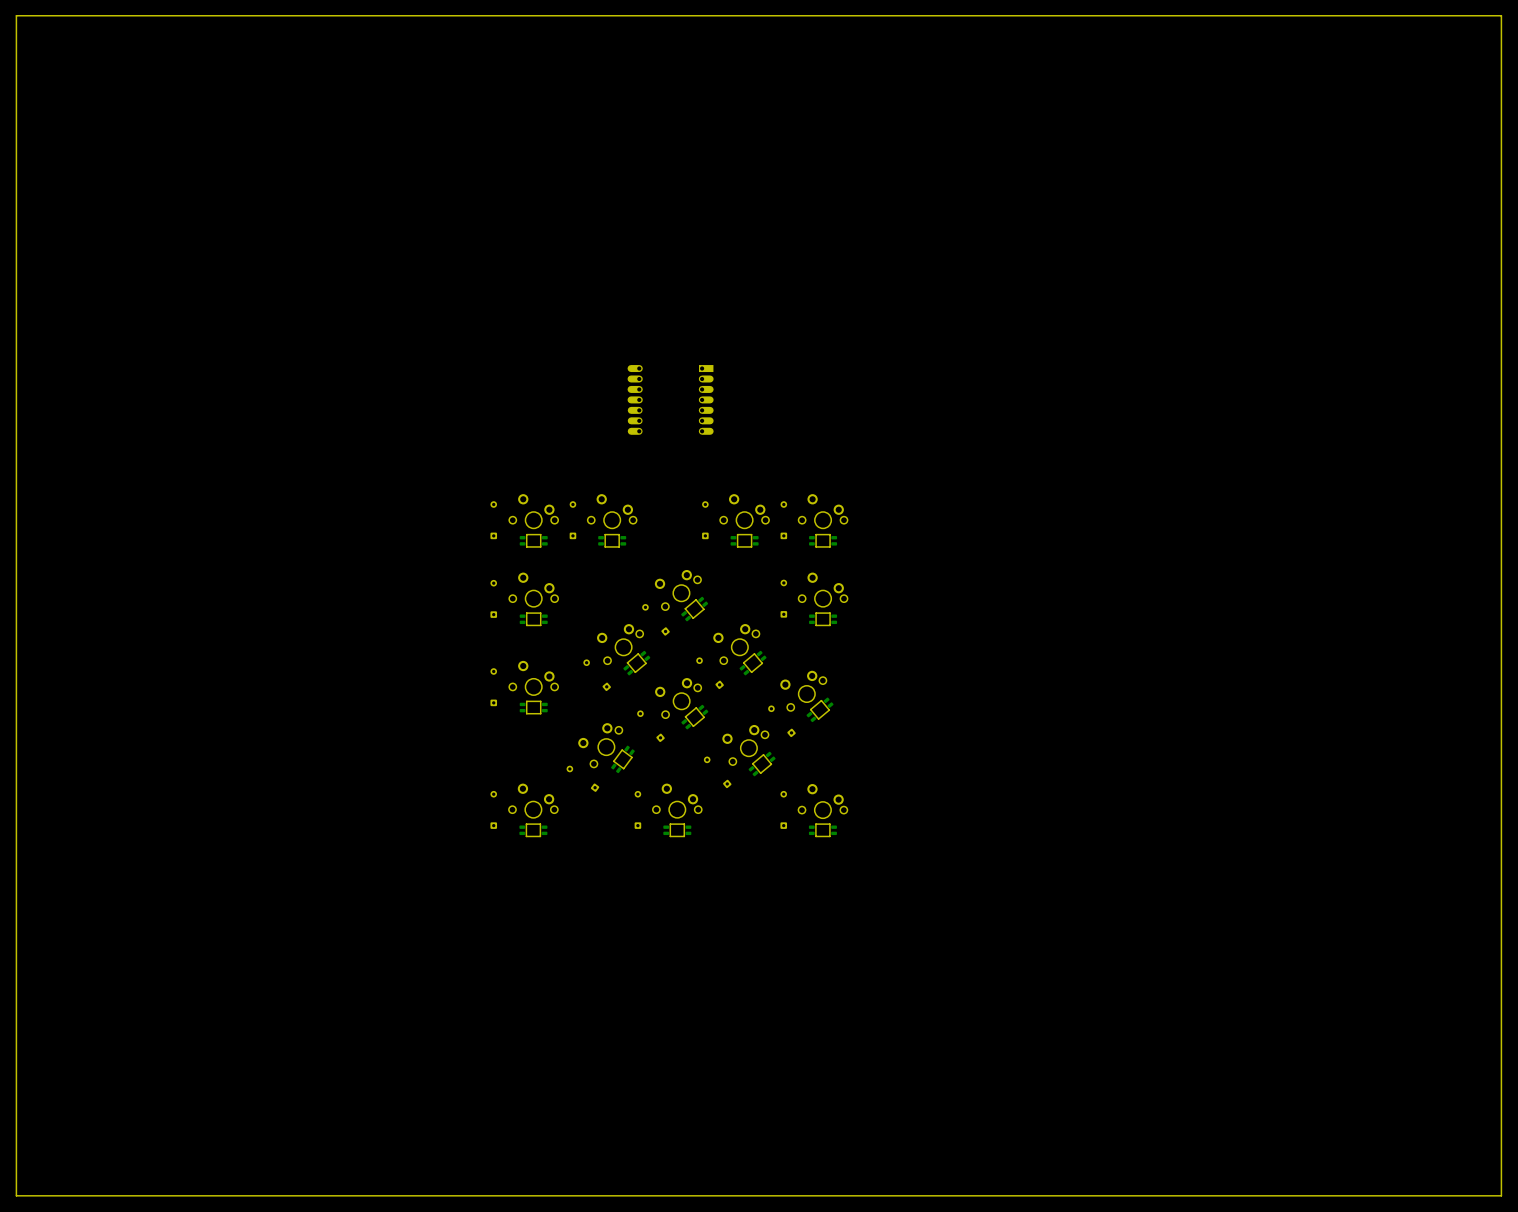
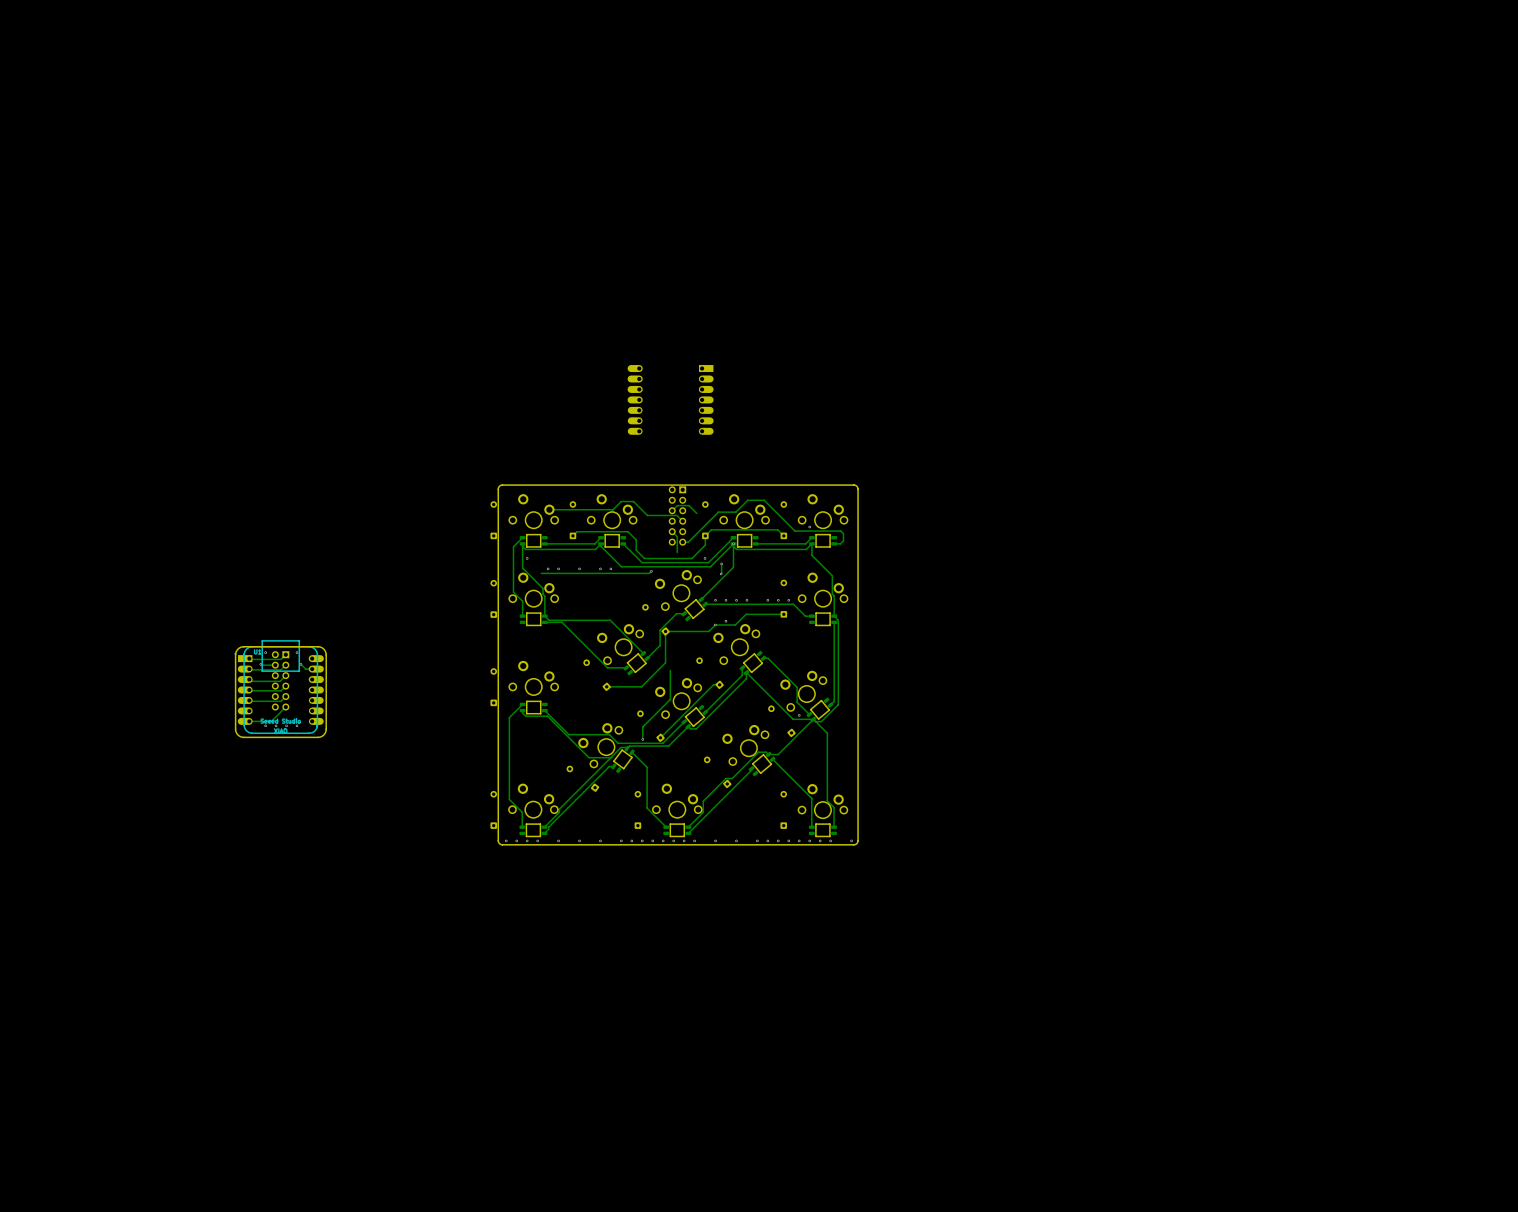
board edge: (1501, 15) (16, 15) (16, 1195) (1501, 1195) (1501, 15) -> none
board edge: none -> (853, 485) (499, 486) (499, 843) (856, 843) (858, 489) (853, 485)
track: none -> (549, 509) (612, 509) (621, 501) (633, 501) (647, 515) (677, 515) (682, 521)
track: none -> (672, 510) (677, 505) (688, 505) (696, 513)
part: none -> (677, 515)
via: none -> (809, 527)
track: none -> (672, 531) (677, 536) (677, 552)
track: none -> (783, 535) (777, 529) (711, 529) (705, 535) (705, 545) (691, 558) (644, 558) (636, 550) (636, 539) (628, 531) (577, 531) (572, 535)
track: none -> (522, 537) (513, 546) (513, 592) (522, 601) (522, 616)
track: none -> (601, 537) (594, 543) (544, 543)
track: none -> (733, 537) (708, 562) (642, 562) (623, 543)
track: none -> (811, 537) (805, 543) (755, 543)
track: none -> (682, 542) (688, 542) (718, 512) (735, 512) (747, 500) (764, 500) (794, 531) (840, 531) (843, 533) (843, 540) (840, 543) (834, 543)
track: none -> (522, 543) (522, 568) (543, 588) (544, 616) (548, 620) (610, 620) (643, 653)
via: none -> (733, 543)
track: none -> (522, 546) (525, 549) (595, 549) (601, 543) (601, 546) (621, 566) (710, 566) (733, 543) (733, 567) (701, 599)
track: none -> (733, 546) (736, 549) (806, 549) (811, 543) (811, 555) (832, 575) (834, 616) (838, 620) (838, 704) (821, 721) (815, 721)
via: none -> (527, 558)
via: none -> (705, 558)
track: none -> (721, 563) (721, 574)
via: none -> (721, 563)
via: none -> (548, 568)
via: none -> (558, 568)
via: none -> (579, 568)
via: none -> (600, 568)
via: none -> (610, 568)
track: none -> (651, 571) (649, 573) (541, 573)
via: none -> (651, 571)
via: none -> (721, 574)
via: none -> (715, 600)
via: none -> (725, 600)
via: none -> (736, 600)
via: none -> (746, 600)
via: none -> (767, 600)
via: none -> (778, 600)
via: none -> (788, 600)
track: none -> (705, 604) (793, 604) (805, 616) (811, 616)
track: none -> (684, 613) (676, 613) (660, 630) (660, 645) (647, 658)
track: none -> (783, 614) (746, 614) (735, 624) (715, 624) (708, 631) (665, 631) (665, 662) (641, 686) (606, 686)
via: none -> (725, 621)
track: none -> (544, 622) (562, 622) (607, 667) (626, 667)
track: none -> (834, 622) (834, 701) (830, 705)
via: none -> (715, 624)
board edge: none -> (317, 646) (243, 646) (238, 649) (235, 654) (235, 729) (238, 734) (243, 737) (317, 737) (323, 734) (326, 729) (326, 654) (323, 648) (317, 646)
via: none -> (265, 652)
via: none -> (297, 652)
track: none -> (285, 654) (281, 659) (249, 658)
track: none -> (763, 658) (768, 658) (797, 687) (797, 702) (809, 714)
track: none -> (260, 664) (275, 665)
via: none -> (260, 664)
track: none -> (300, 664) (305, 669) (312, 669)
via: none -> (300, 664)
track: none -> (285, 665) (281, 669) (249, 669)
track: none -> (742, 667) (742, 675) (705, 712)
track: none -> (670, 670) (670, 699) (642, 727) (642, 739)
track: none -> (285, 675) (280, 681) (251, 681) (249, 679)
part: none -> (280, 680)
track: none -> (719, 684) (713, 684) (660, 737)
track: none -> (285, 686) (281, 690) (249, 690)
part: none -> (279, 687)
track: none -> (285, 696) (281, 701) (249, 700)
track: none -> (522, 704) (509, 717) (509, 799) (522, 812) (522, 827)
track: none -> (285, 707) (271, 721) (249, 721)
track: none -> (522, 710) (525, 716) (547, 716) (588, 757) (610, 757)
track: none -> (544, 710) (568, 734) (609, 734) (618, 743) (662, 743) (684, 721)
via: none -> (799, 715)
track: none -> (813, 719) (827, 733) (827, 800) (834, 807) (834, 827)
track: none -> (813, 719) (793, 719) (746, 672) (746, 678) (696, 728) (690, 728) (688, 726) (668, 746) (621, 747) (559, 809) (559, 812) (544, 827)
track: none -> (813, 719) (778, 754) (758, 752) (732, 778) (726, 778) (703, 801) (703, 812) (688, 827)
via: none -> (265, 725)
via: none -> (276, 725)
via: none -> (286, 725)
via: none -> (297, 725)
via: none -> (642, 739)
track: none -> (632, 752) (647, 767) (647, 808) (666, 827)
track: none -> (772, 759) (811, 798) (811, 827)
track: none -> (613, 766) (609, 766) (544, 833)
track: none -> (751, 768) (688, 833)
via: none -> (506, 840)
via: none -> (516, 840)
via: none -> (527, 840)
via: none -> (537, 840)
via: none -> (558, 840)
via: none -> (579, 840)
via: none -> (600, 840)
via: none -> (621, 840)
via: none -> (631, 840)
via: none -> (642, 840)
via: none -> (652, 840)
via: none -> (663, 840)
via: none -> (673, 840)
via: none -> (684, 840)
via: none -> (694, 840)
via: none -> (715, 840)
via: none -> (736, 840)
via: none -> (757, 840)
via: none -> (767, 840)
via: none -> (778, 840)
via: none -> (788, 840)
via: none -> (799, 840)
via: none -> (809, 840)
via: none -> (820, 840)
via: none -> (830, 840)
via: none -> (851, 840)

